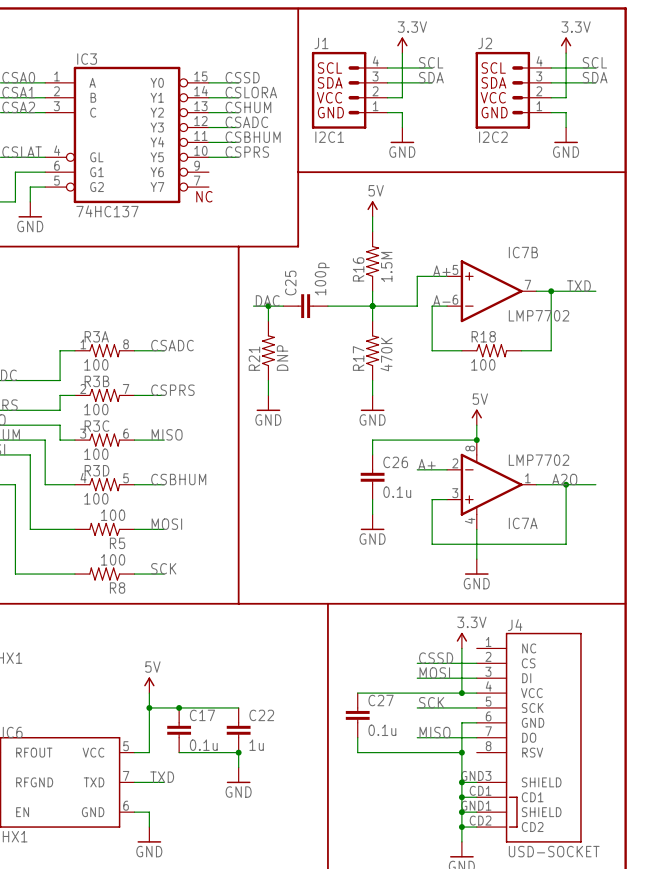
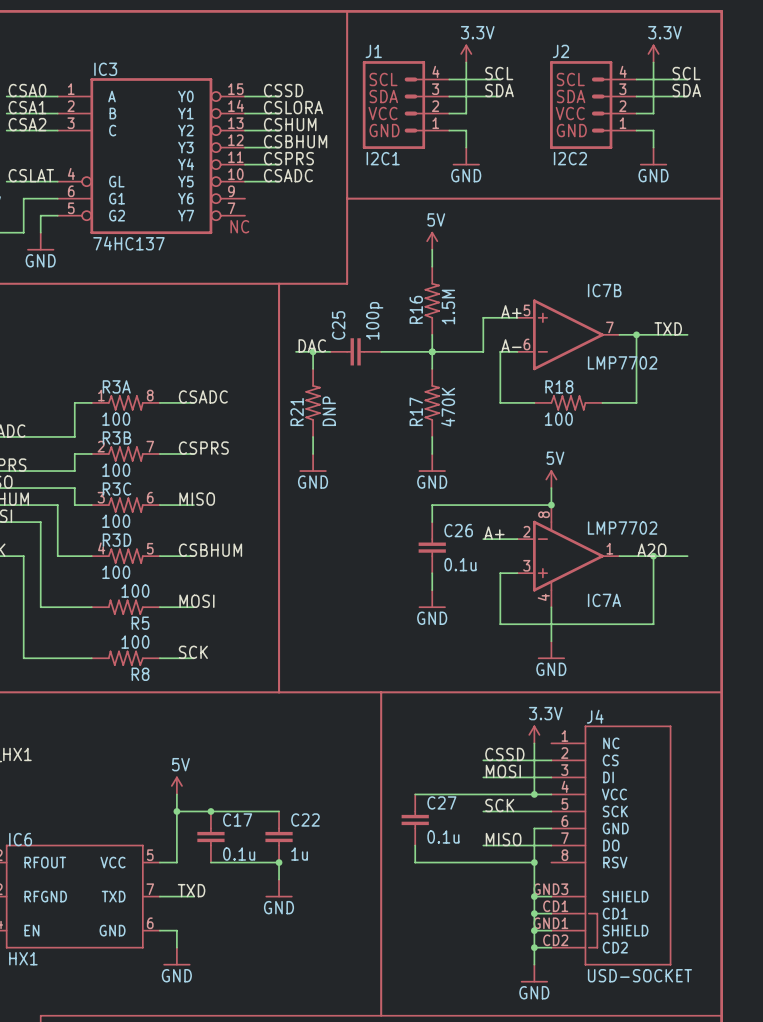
label: CSADC (246, 122) -> CSBHUM (295, 141)
label: CSBHUM (253, 137) -> CSPRS (288, 158)
label: CSPRS (247, 152) -> CSADC (288, 175)

